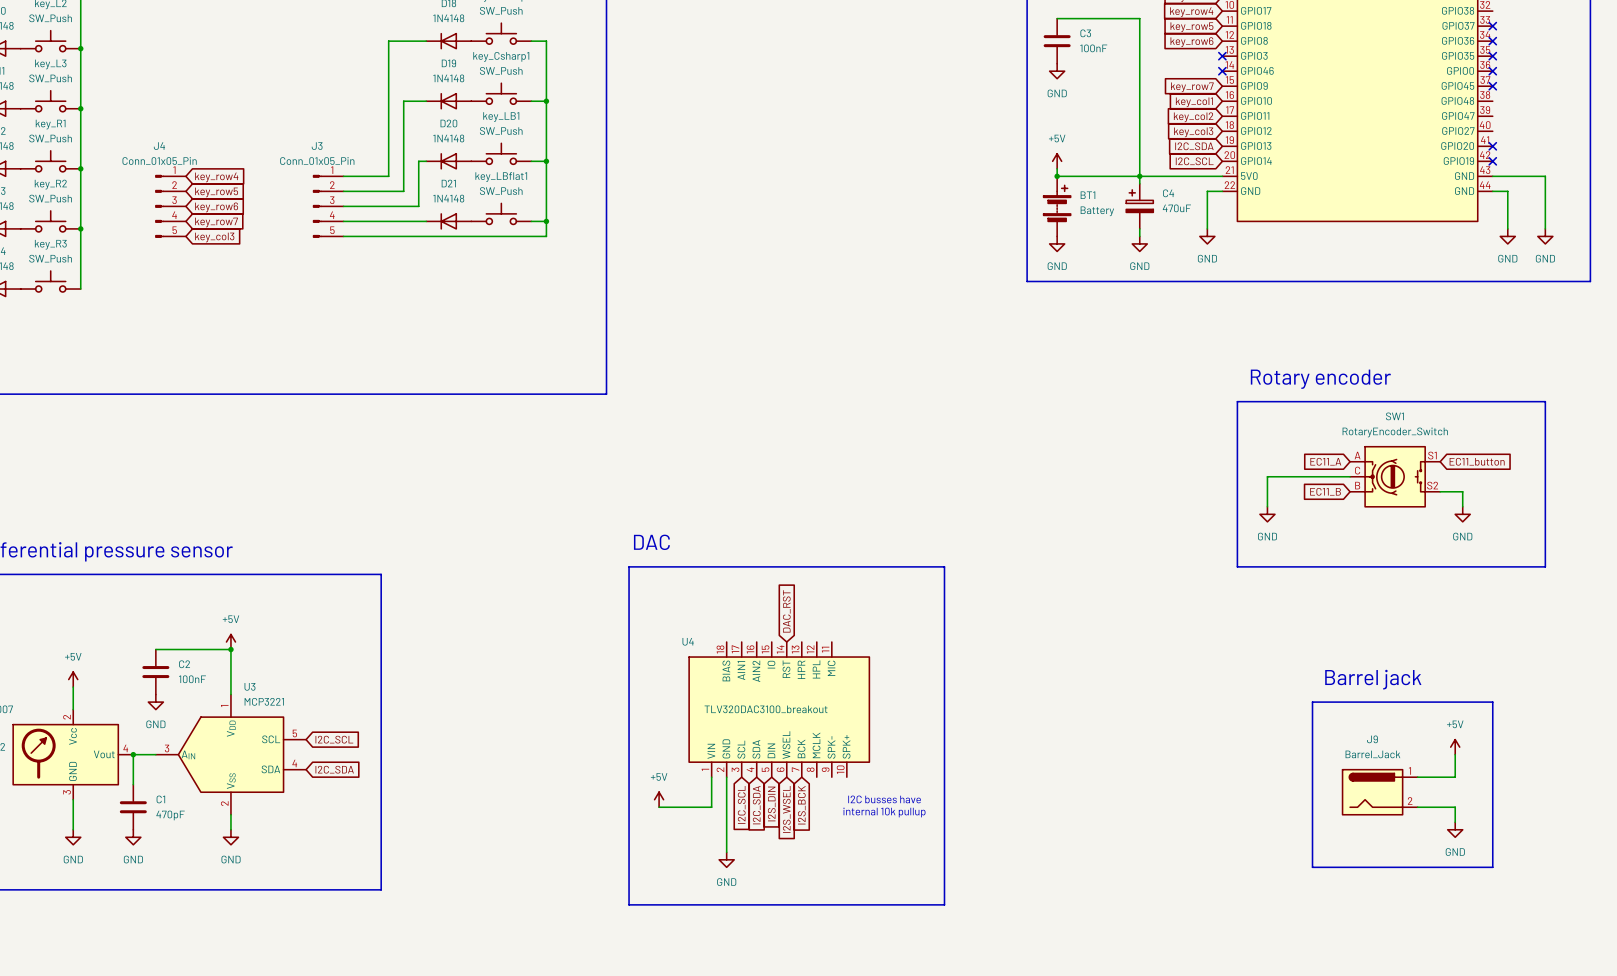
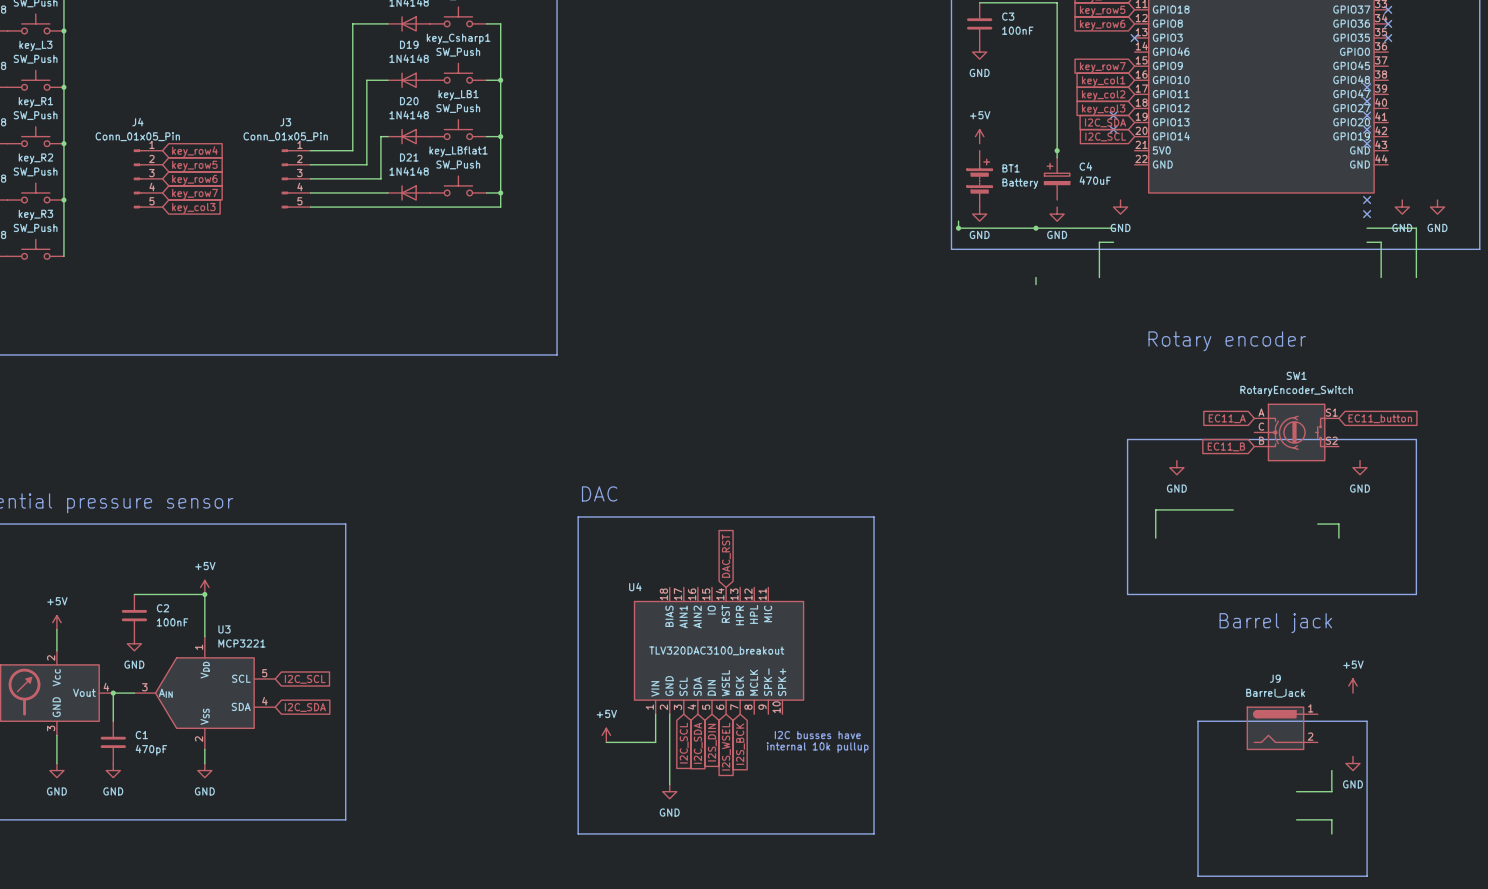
no-connect mark: (1222, 71) -> none
no-connect mark: (1492, 71) -> none
no-connect mark: (1492, 86) -> none
no-connect mark: none -> (1367, 87)
no-connect mark: none -> (1367, 101)
no-connect mark: none -> (1113, 115)
no-connect mark: none -> (1367, 115)
no-connect mark: (1492, 146) -> none
no-connect mark: none -> (1113, 129)
no-connect mark: none -> (1367, 129)
no-connect mark: (1492, 161) -> none
wire: (1057, 168) (1057, 176) (1222, 176) -> (958, 221) (958, 228) (1113, 228)
no-connect mark: none -> (1367, 143)
junction: (1057, 176) -> none
wire: (1492, 176) (1545, 176) (1545, 228) -> (1367, 228) (1416, 228) (1416, 277)
wire: (1222, 191) (1207, 191) (1207, 228) -> (1113, 242) (1099, 242) (1099, 277)
wire: (1492, 191) (1507, 191) (1507, 228) -> (1367, 242) (1381, 242) (1381, 277)
wire: (1139, 228) (1139, 236) -> (1036, 277) (1036, 284)
no-connect mark: none -> (1367, 200)
no-connect mark: none -> (1367, 214)
junction: none -> (958, 228)
junction: none -> (1036, 228)
line: (1237, 401) (1545, 401) (1545, 566) (1237, 566) (1237, 401) -> (1127, 439) (1416, 439) (1416, 594) (1127, 594) (1127, 439)
wire: (1350, 476) (1267, 476) (1267, 506) -> (1233, 509) (1155, 509) (1155, 538)
wire: (1440, 491) (1462, 491) (1462, 506) -> (1317, 524) (1338, 524) (1338, 538)
line: (1312, 702) (1492, 702) (1492, 867) (1312, 867) (1312, 702) -> (1198, 721) (1367, 721) (1367, 876) (1198, 876) (1198, 721)
wire: (1455, 754) (1455, 777) (1417, 777) -> (1331, 770) (1331, 791) (1296, 791)
wire: (1417, 807) (1455, 807) (1455, 822) -> (1296, 819) (1331, 819) (1331, 833)

